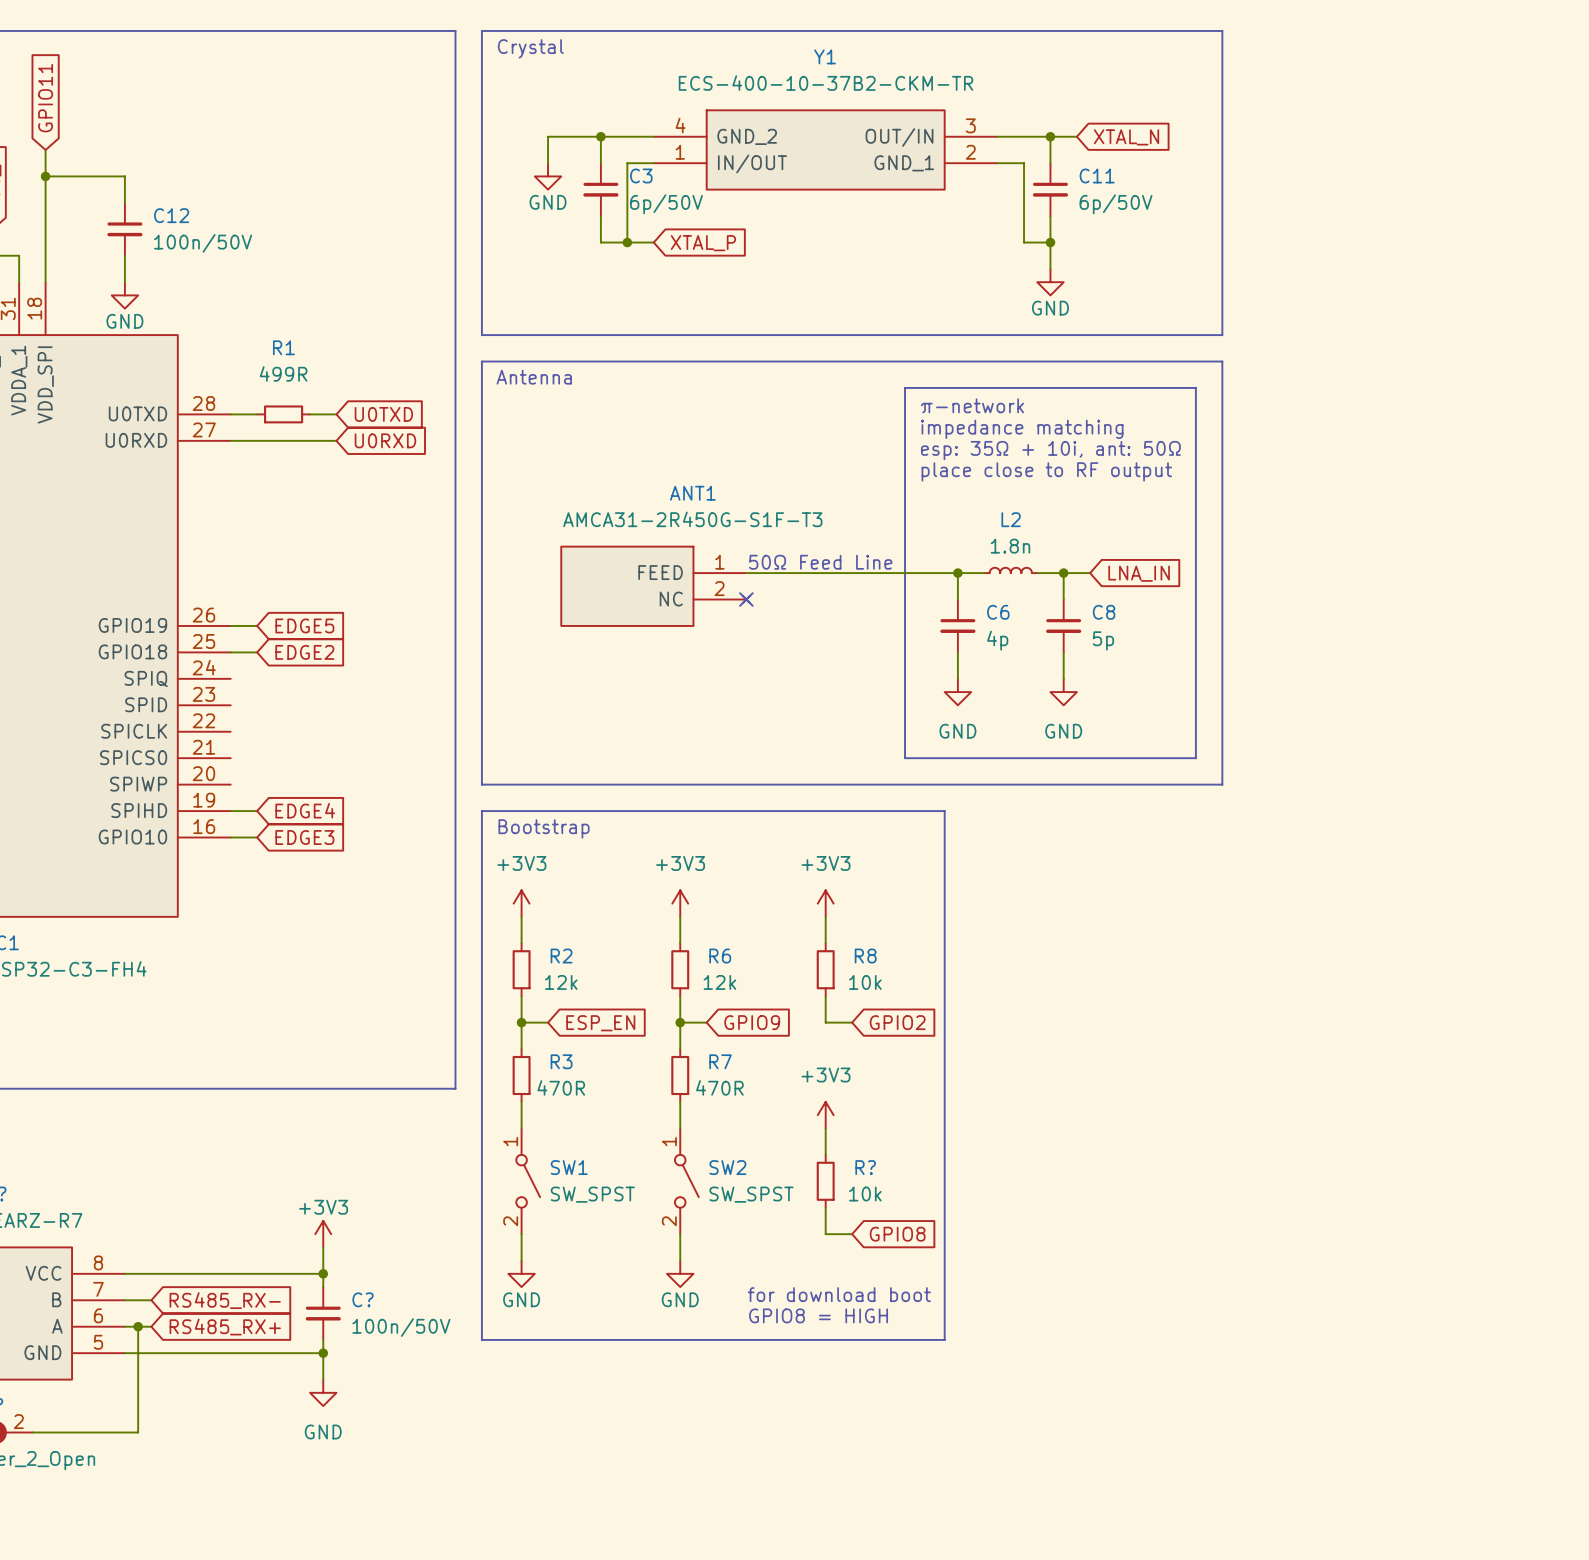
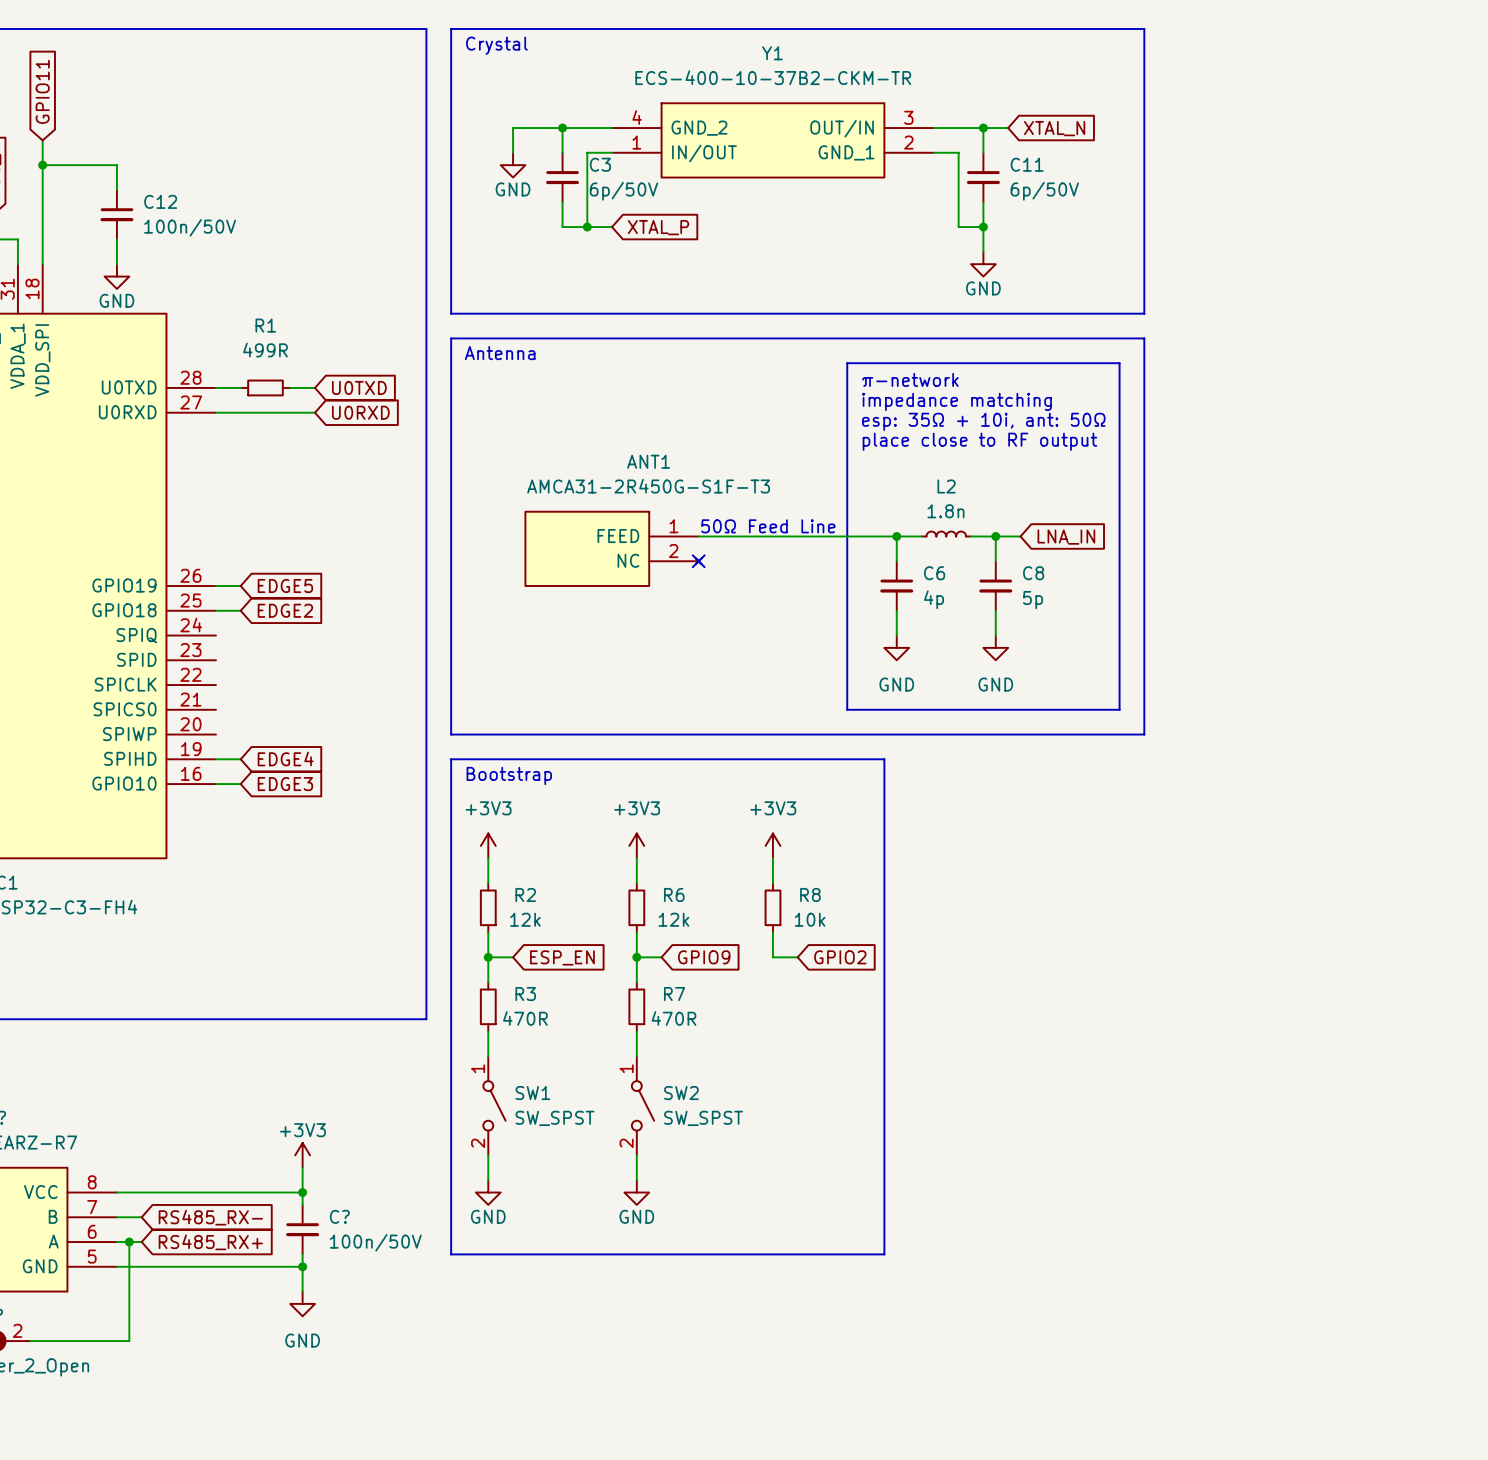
power symbol: +3V3 (825, 1115) -> none
wire: (825, 1128) (825, 1154) -> none
R?: 10k (825, 1181) -> none
wire: (825, 1207) (825, 1234) (852, 1234) -> none
global label: GPIO8 (897, 1234) -> none
text: for download boot (839, 1294) -> none
text: GPIO8 = HIGH (818, 1315) -> none

